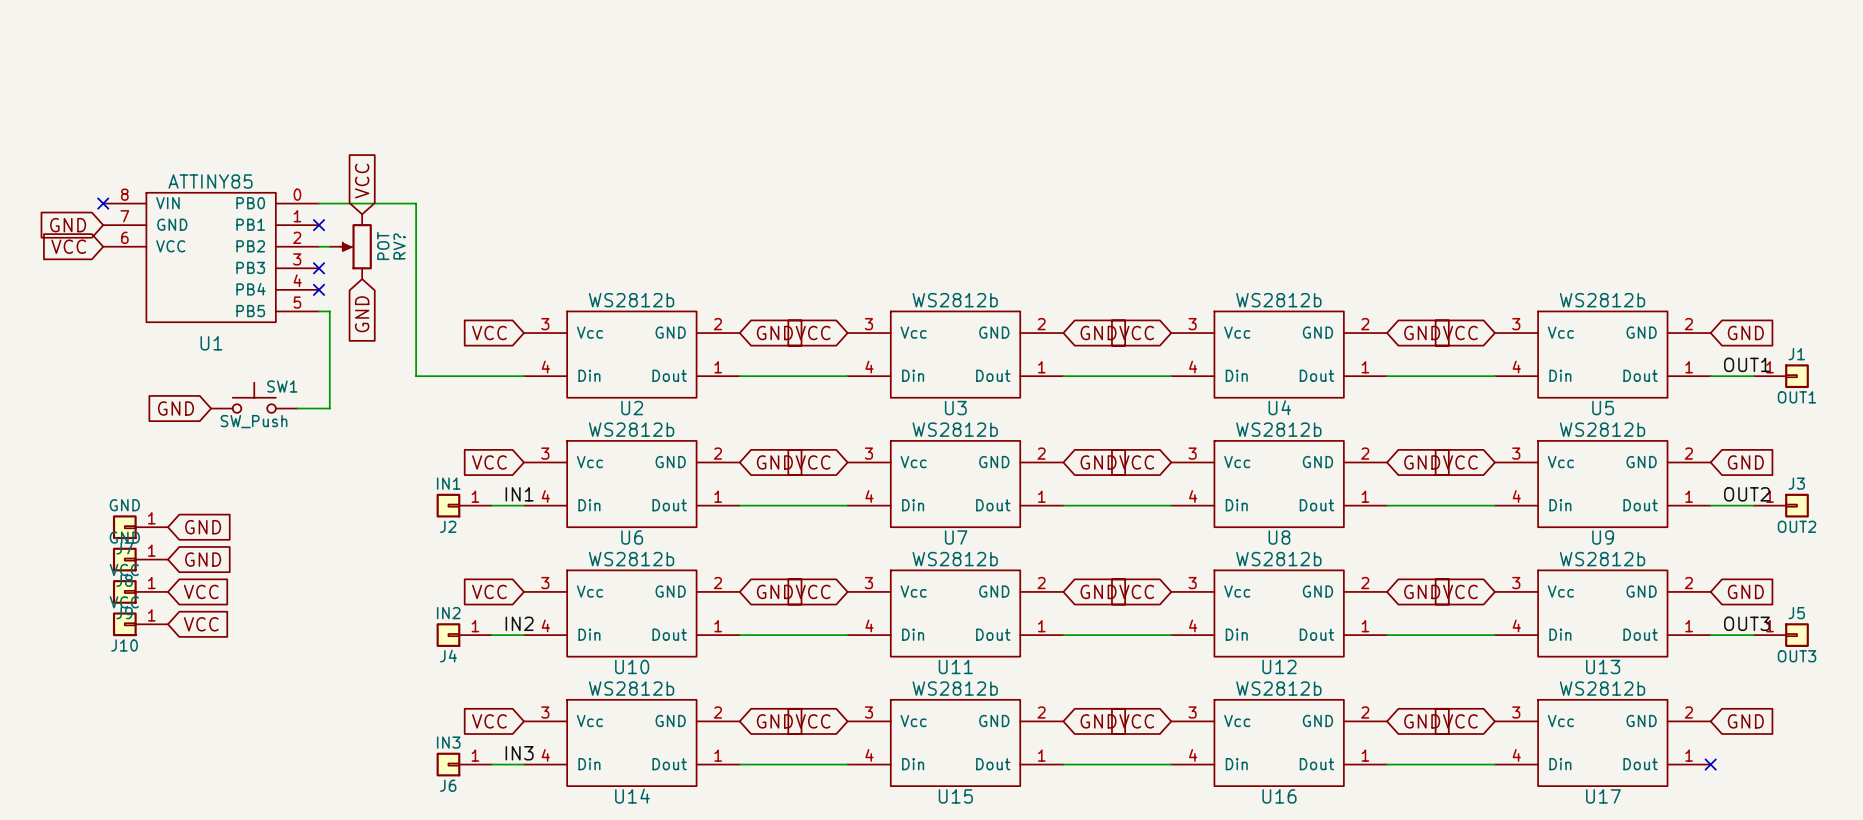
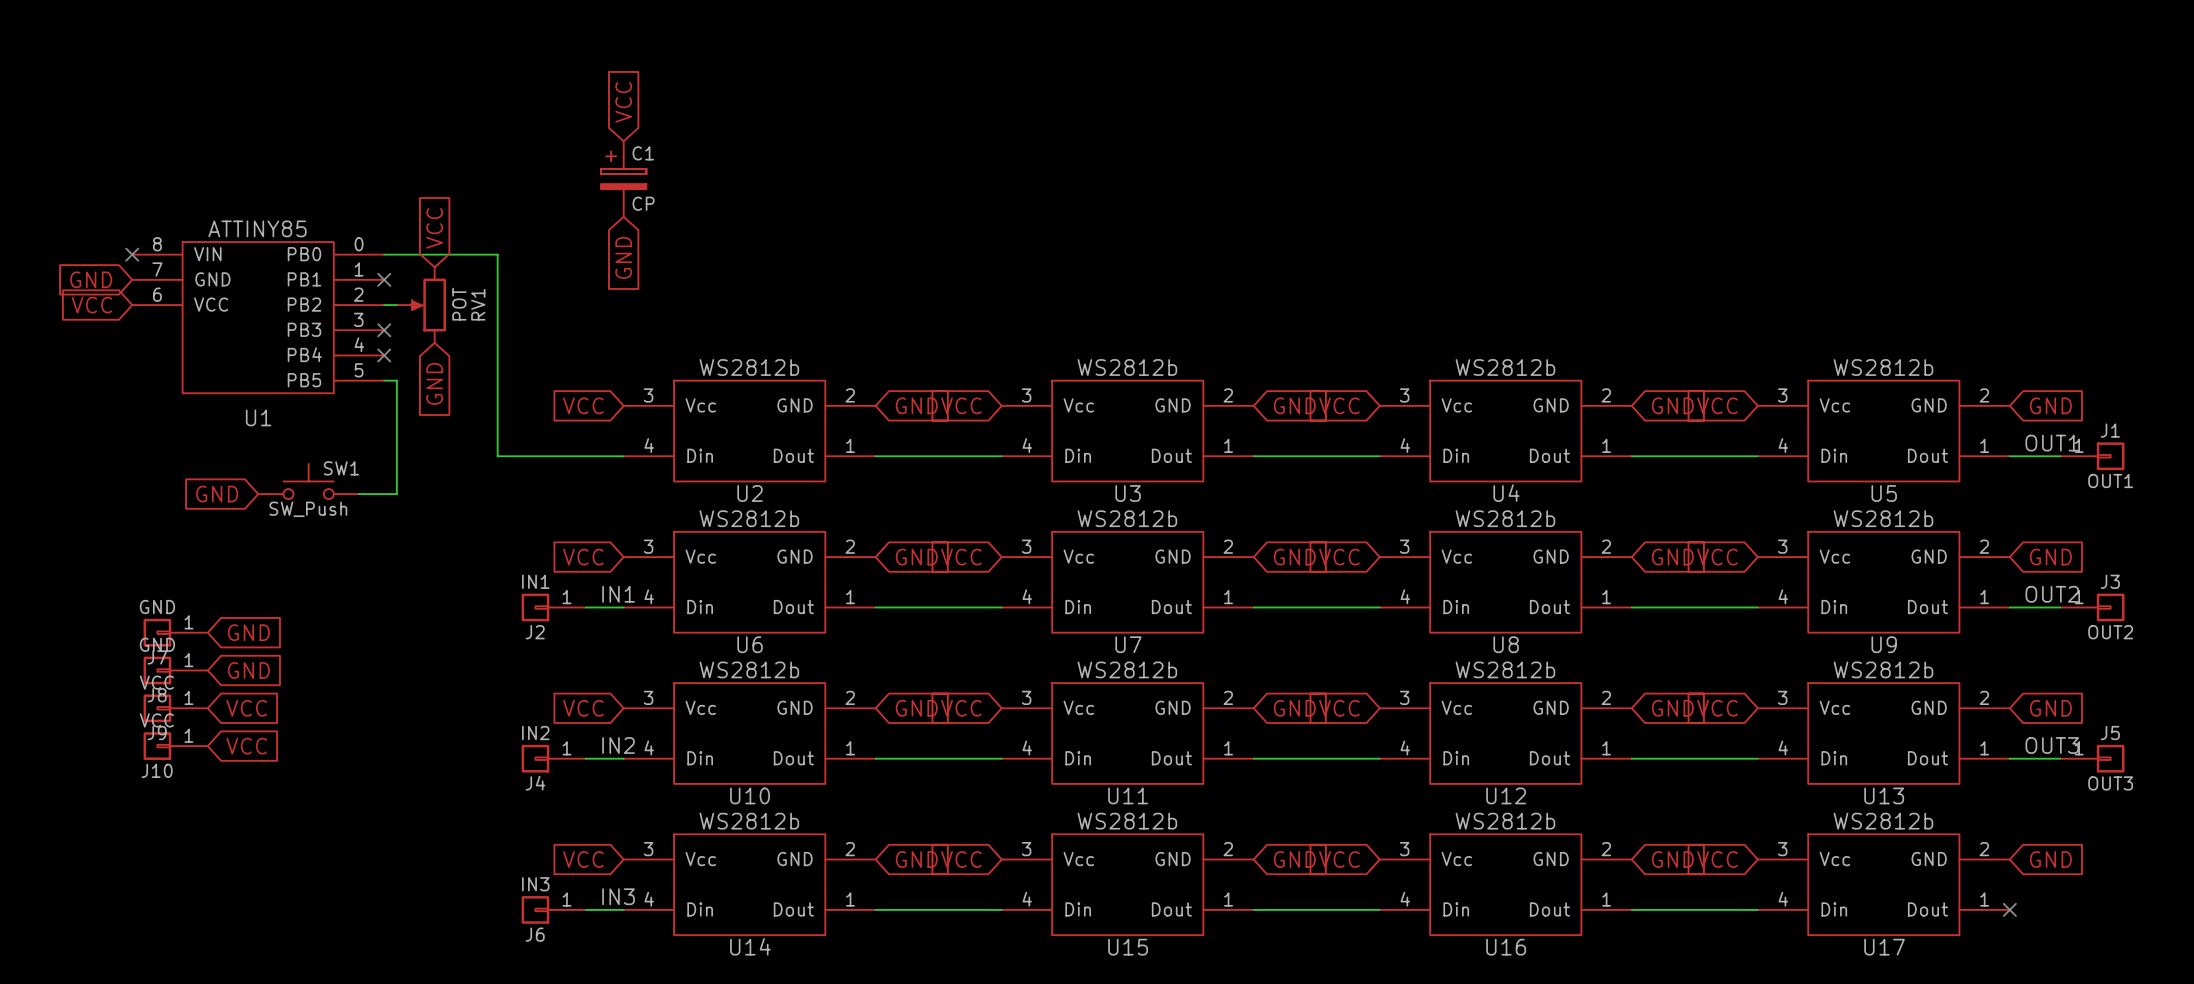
global label: none -> VCC (623, 102)
C1: none -> CP (623, 179)
global label: none -> GND (623, 257)
RV? name: RV? (399, 246) -> RV1 (478, 304)

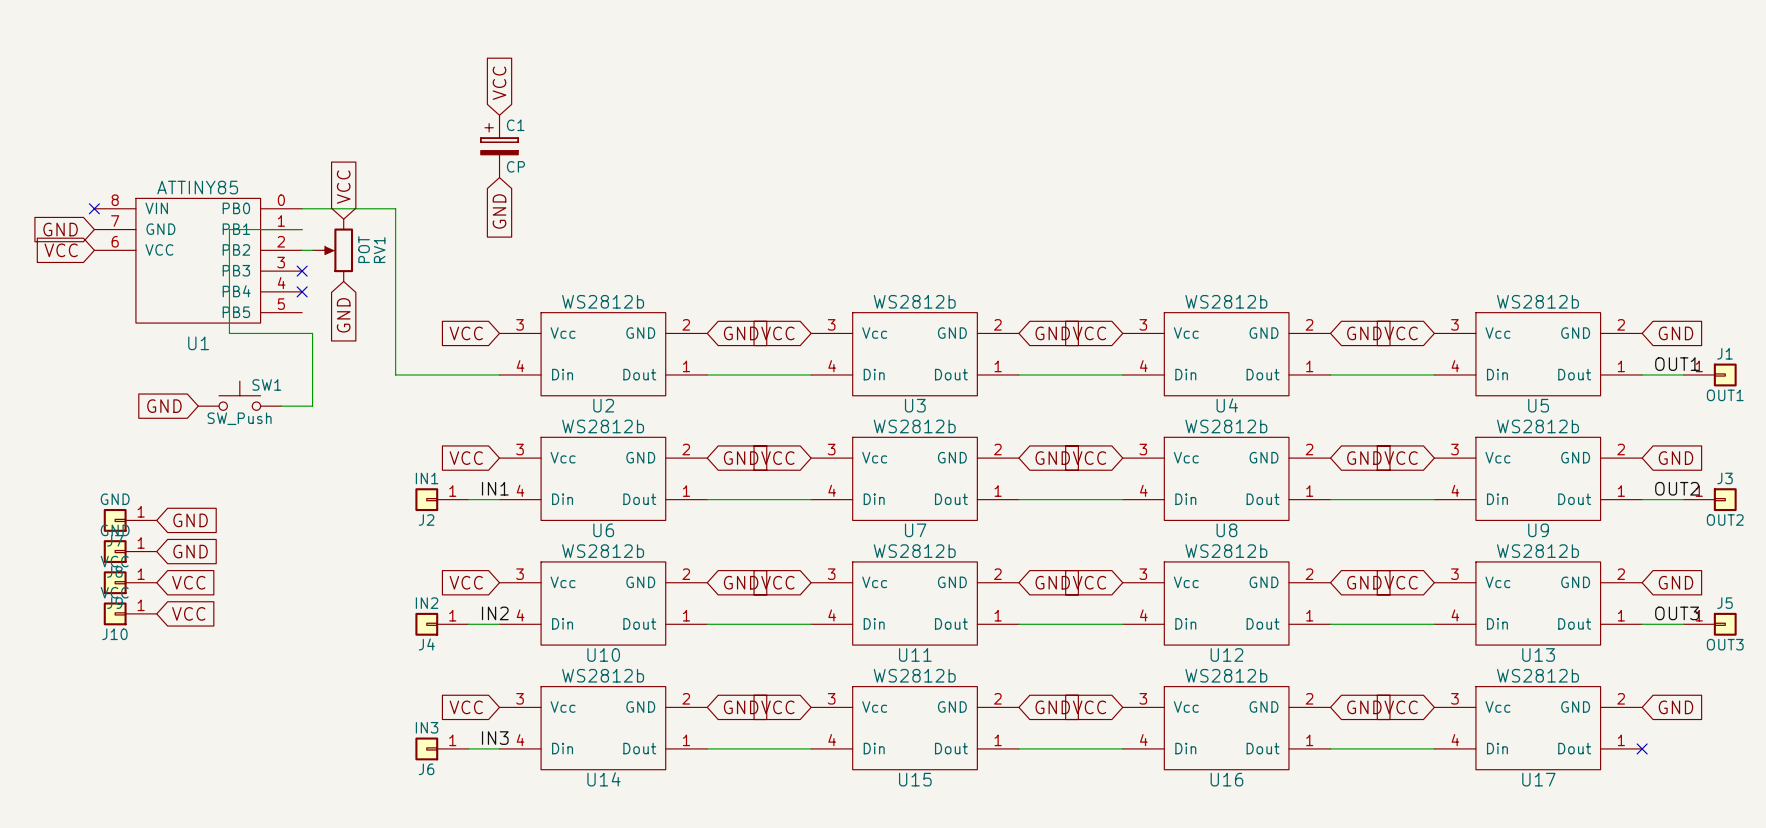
no-connect mark: (384, 279) -> none
wire: (384, 380) (396, 380) (396, 405) -> (302, 229) (229, 229) (229, 333) (312, 333)

